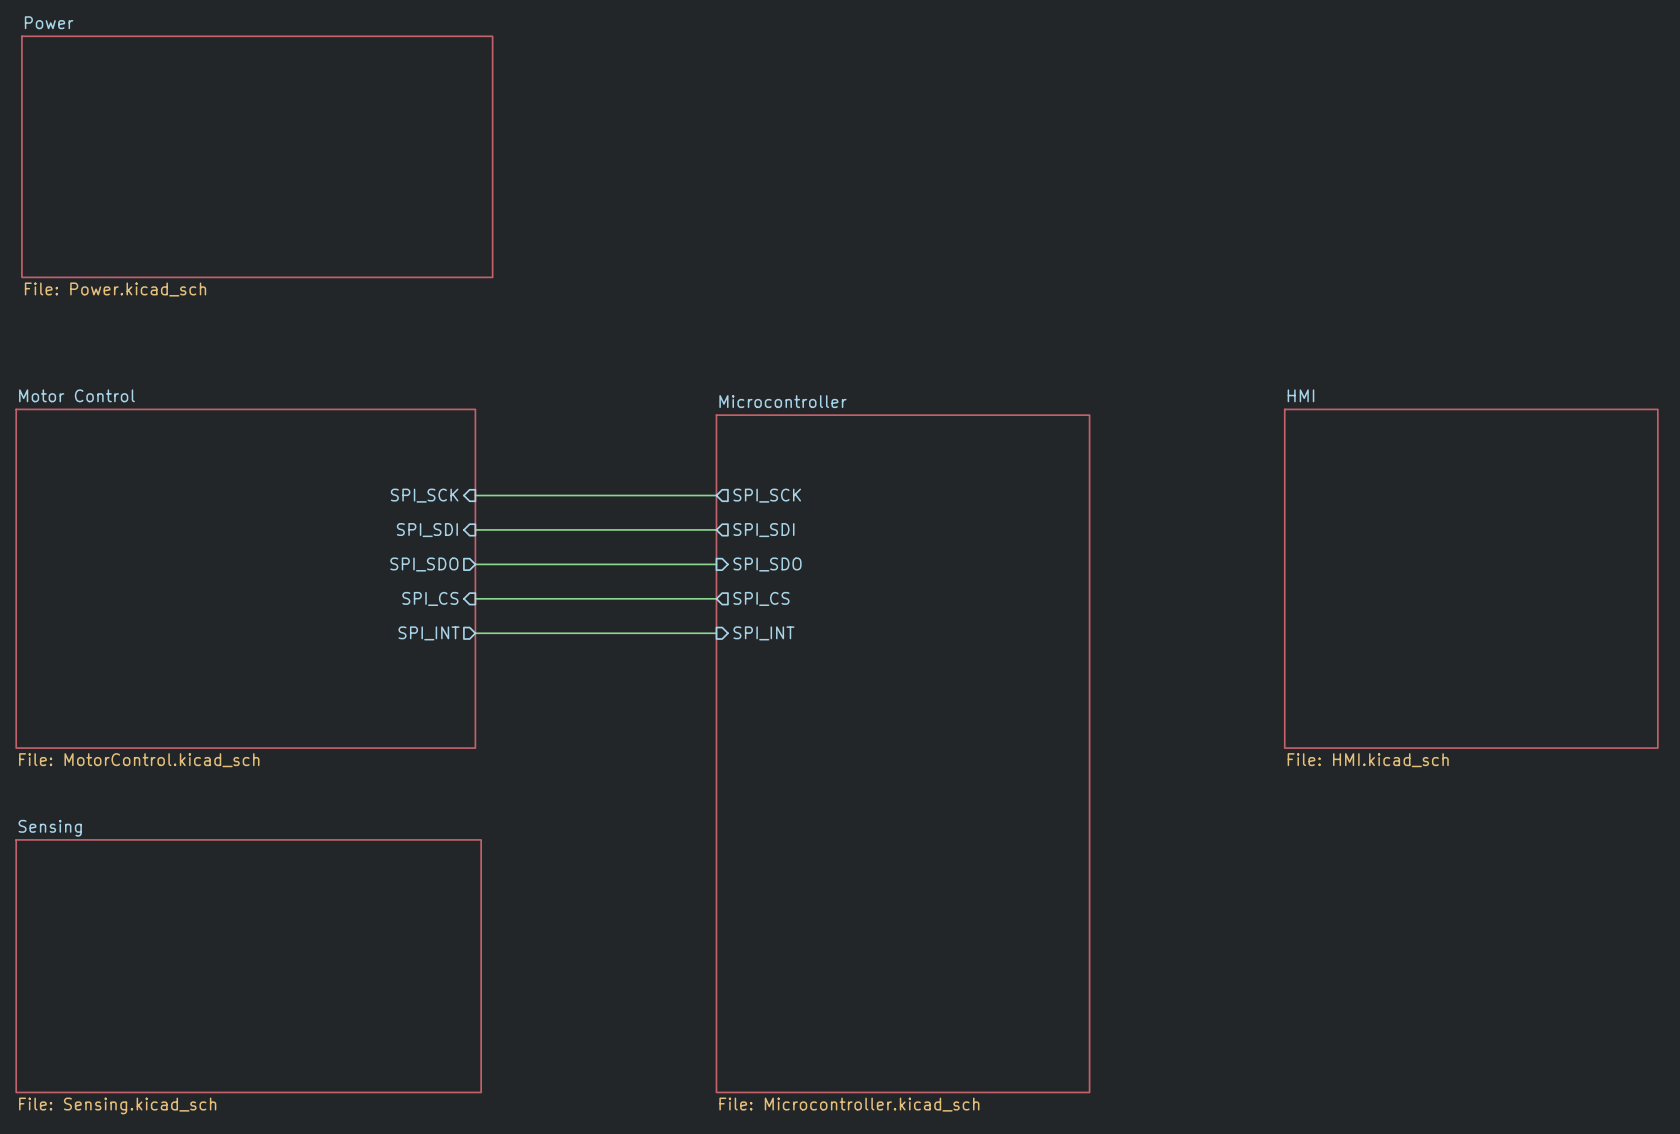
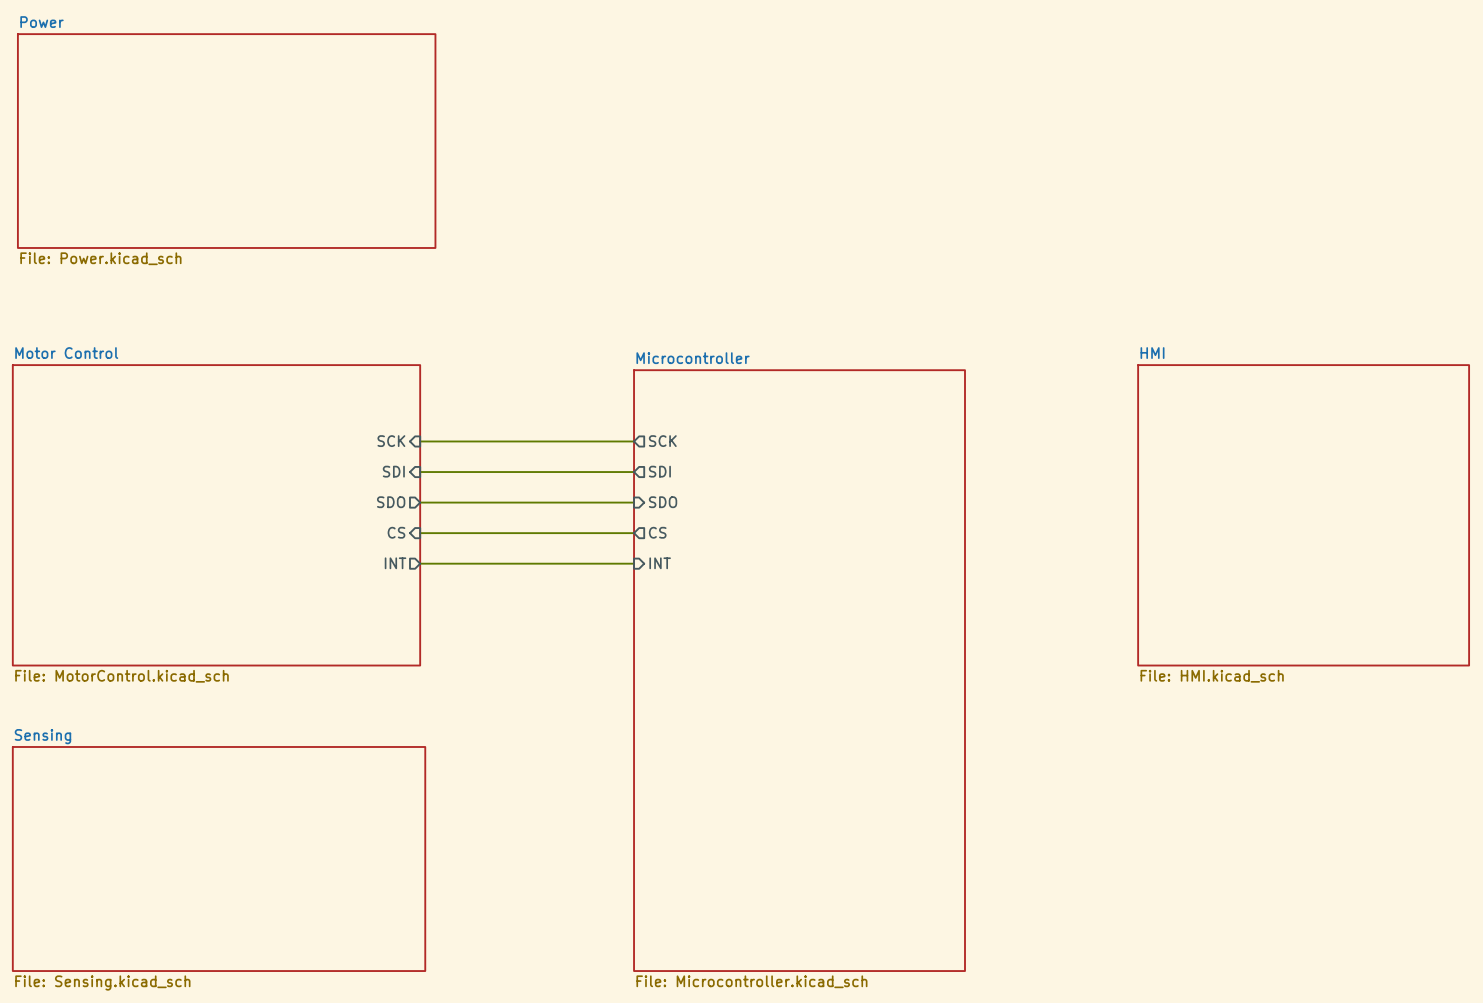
sheet pin: SPI_SCK (424, 495) -> SCK (391, 441)
sheet pin: SPI_SCK (767, 495) -> SCK (662, 441)
sheet pin: SPI_SDI (427, 530) -> SDI (393, 471)
sheet pin: SPI_SDI (763, 530) -> SDI (659, 471)
sheet pin: SPI_SDO (424, 564) -> SDO (391, 502)
sheet pin: SPI_SDO (767, 564) -> SDO (663, 502)
sheet pin: SPI_CS (430, 598) -> CS (396, 532)
sheet pin: SPI_CS (761, 598) -> CS (657, 532)
sheet pin: SPI_INT (429, 633) -> INT (395, 563)
sheet pin: SPI_INT (763, 633) -> INT (660, 563)

